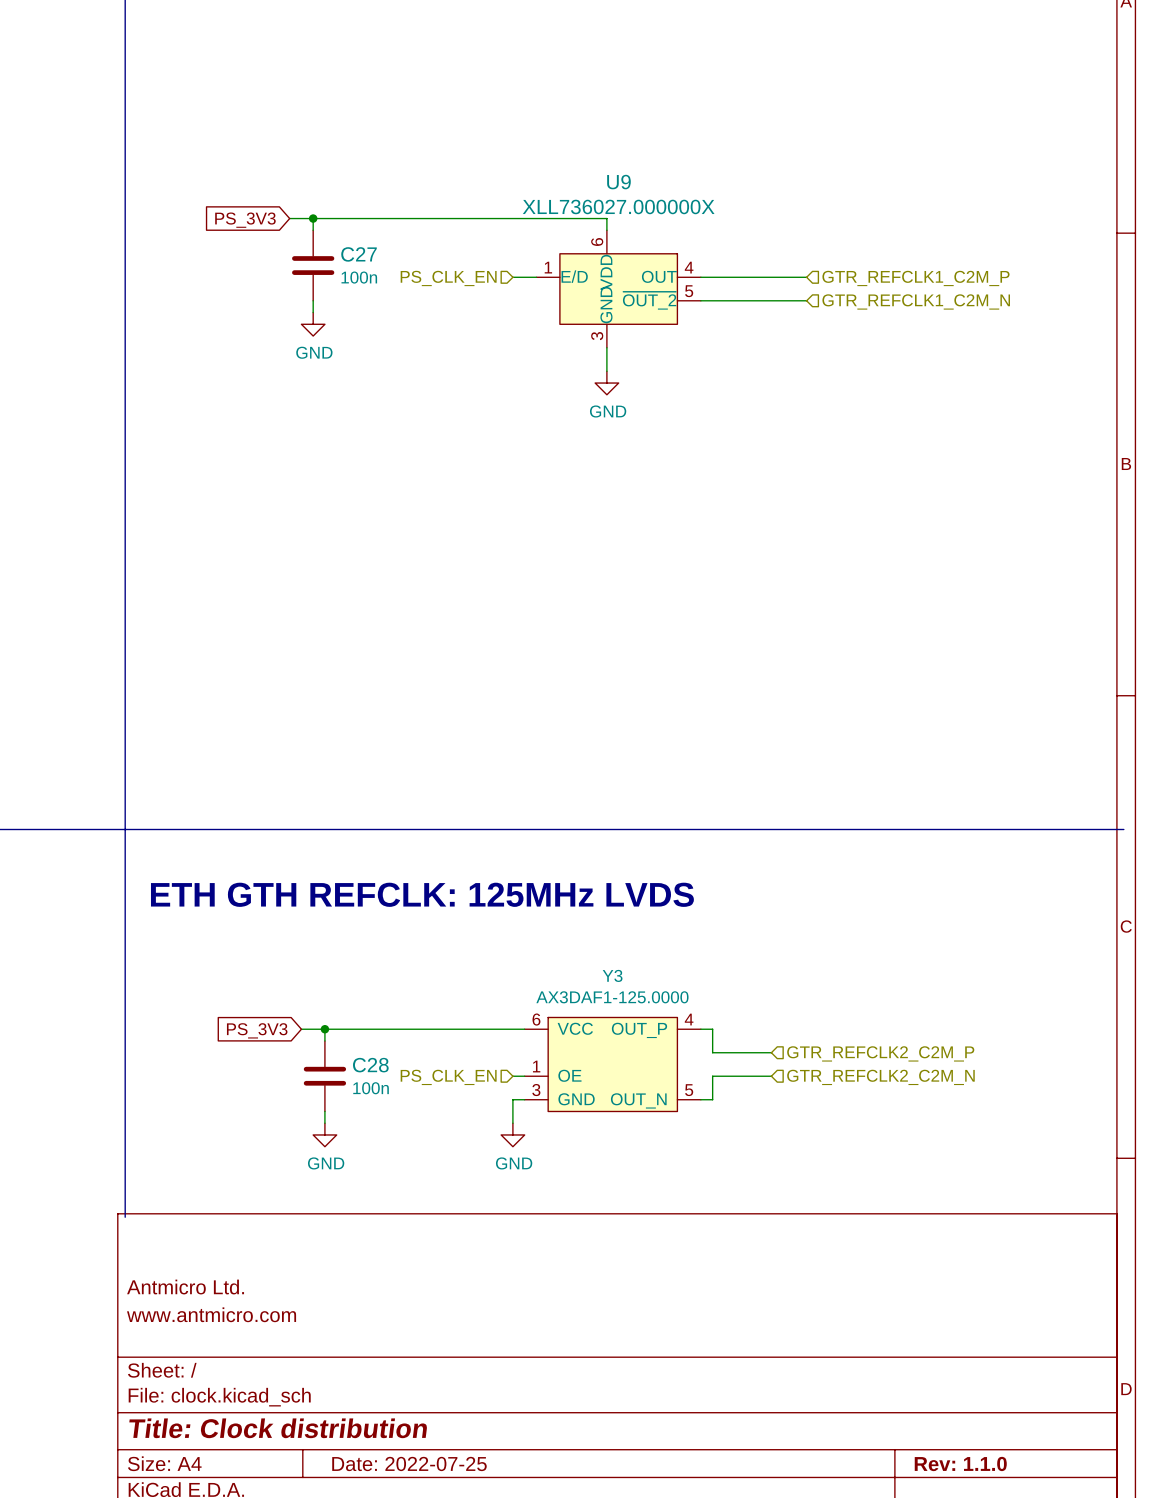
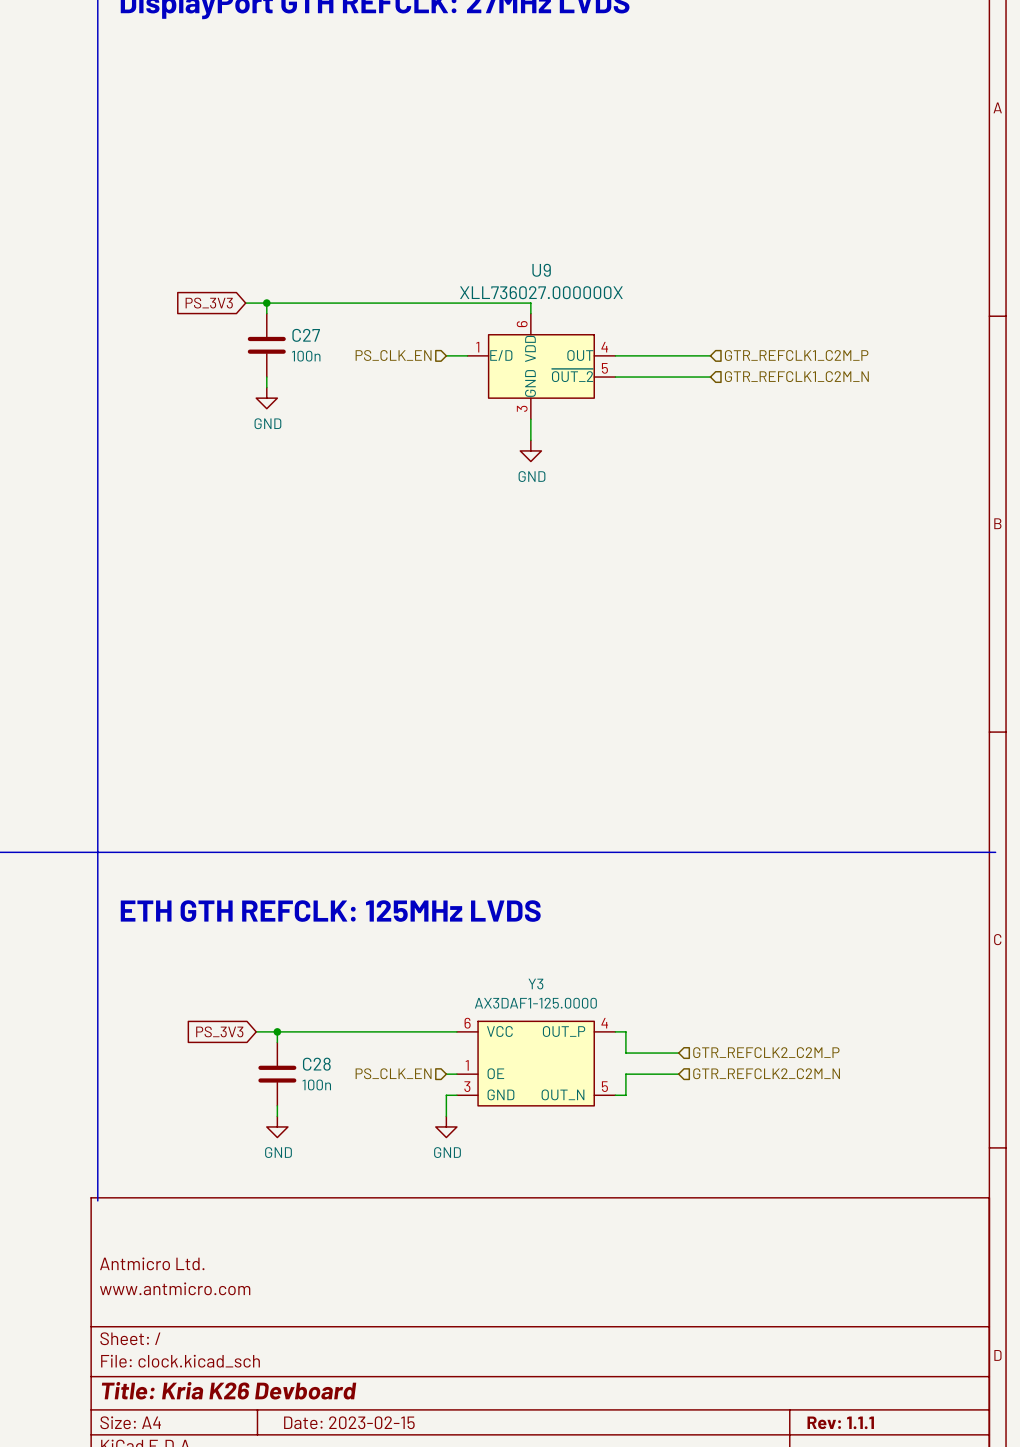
title block: Title: Clock distribution (278, 1428) -> Title: Kria K26 Devboard (229, 1390)
title block: Date: 2022-07-25 (409, 1463) -> Date: 2023-02-15 (349, 1422)
title block: Rev: 1.1.0 (960, 1463) -> Rev: 1.1.1 (840, 1422)

